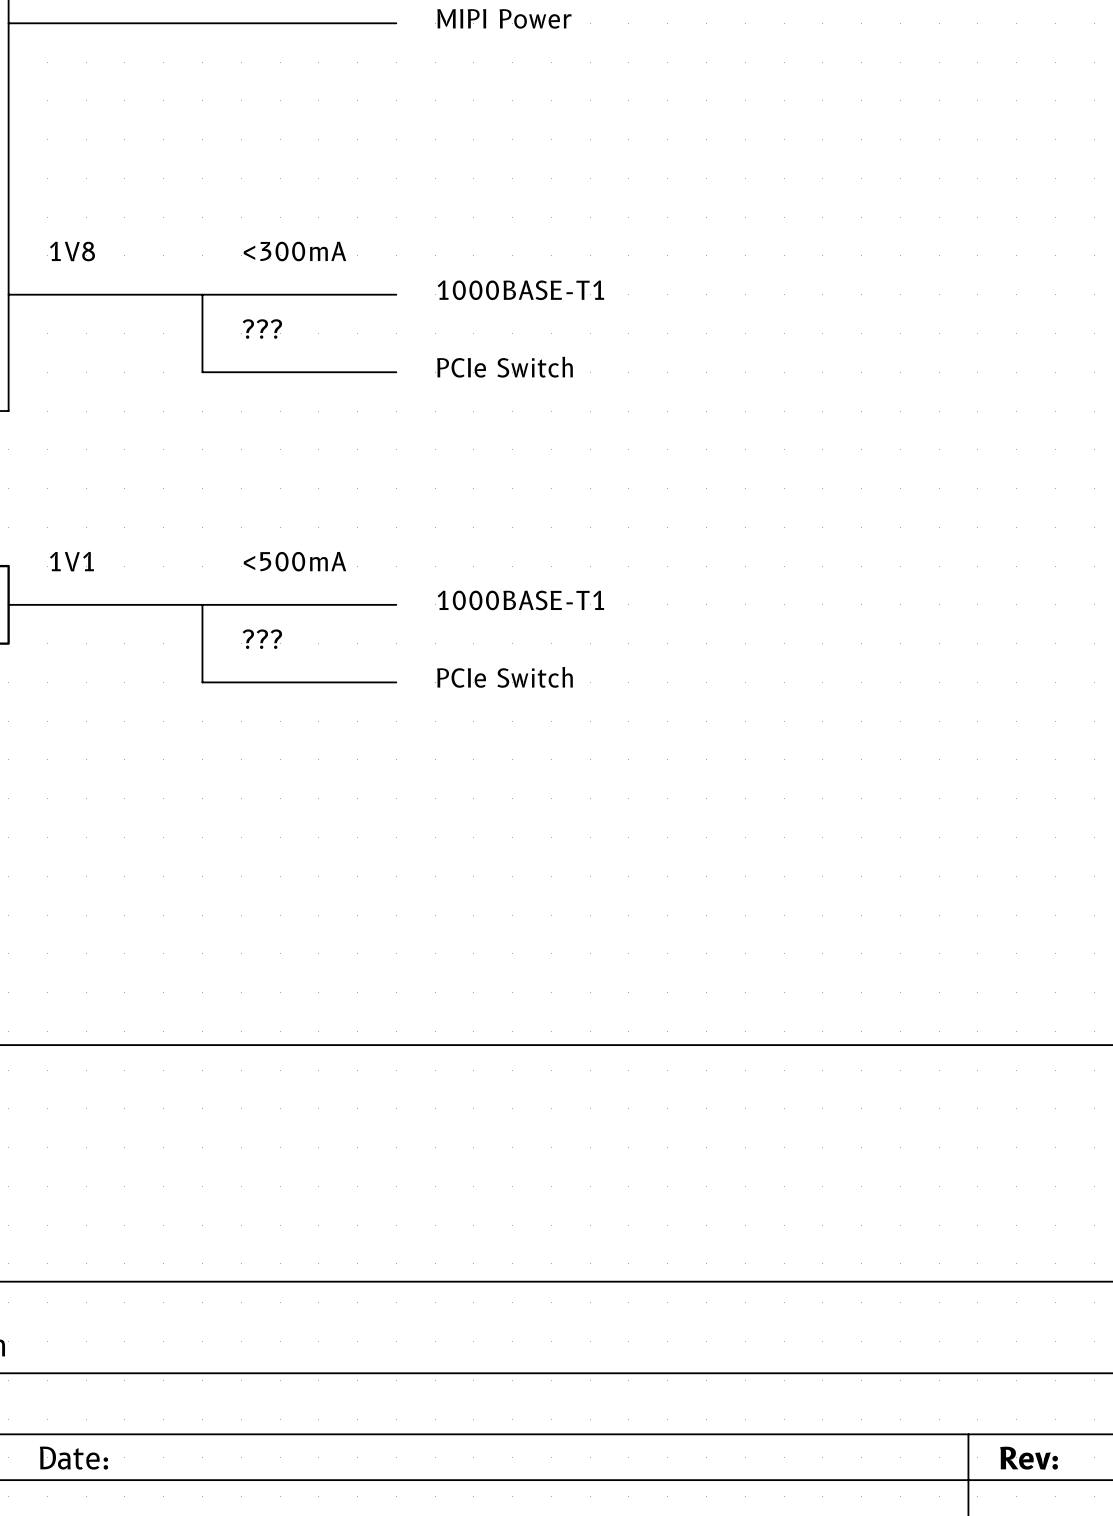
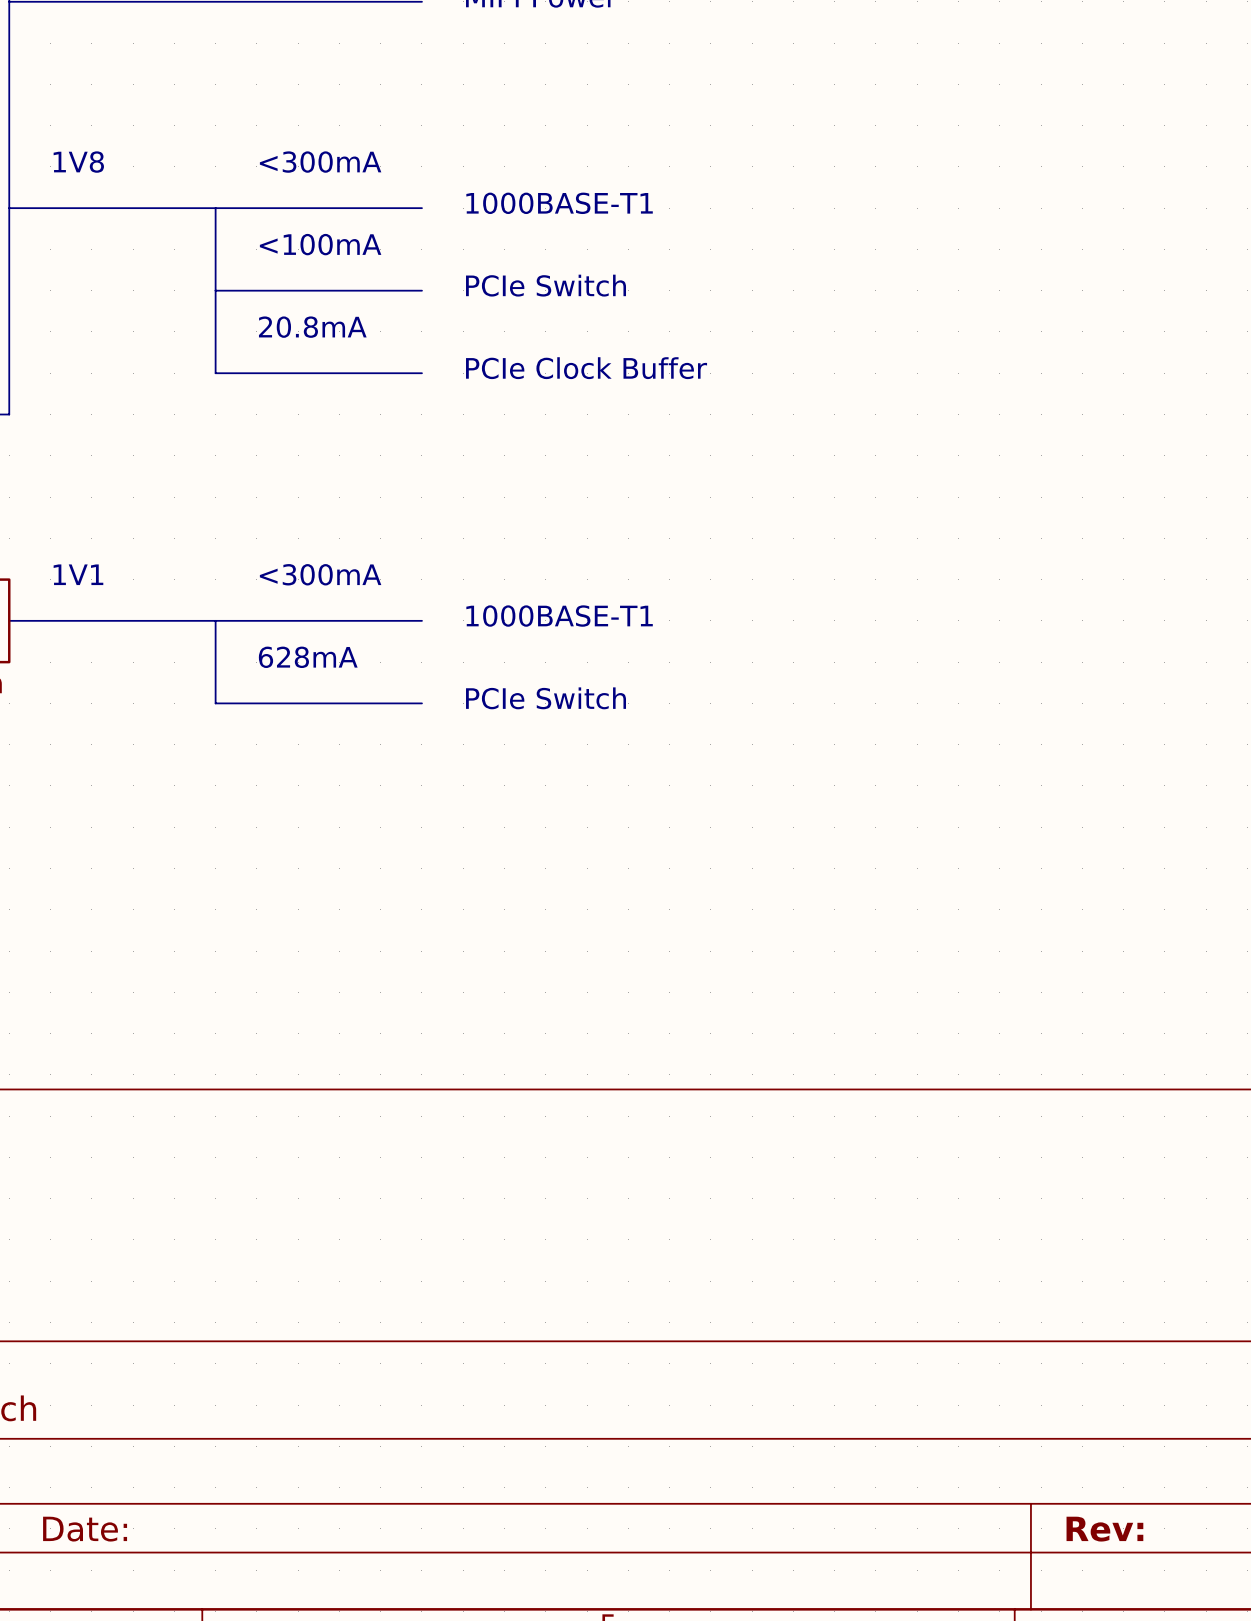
text: none -> <300mA (320, 162)
text: none -> 1000BASE-T1 (559, 203)
line: none -> (9, 208) (421, 208)
text position: 1V8 (72, 251) -> 1V8 (78, 162)
text: <300mA (295, 251) -> <100mA (320, 244)
text: 1000BASE-T1 (520, 290) -> PCIe Switch (546, 285)
line: (8, 294) (202, 294) -> (215, 208) (215, 290)
text: ??? (262, 329) -> 20.8mA (312, 327)
text: PCIe Switch (504, 367) -> PCIe Clock Buffer (586, 368)
text: <500mA (295, 561) -> <300mA (320, 574)
text: ??? (262, 639) -> 628mA (308, 657)

